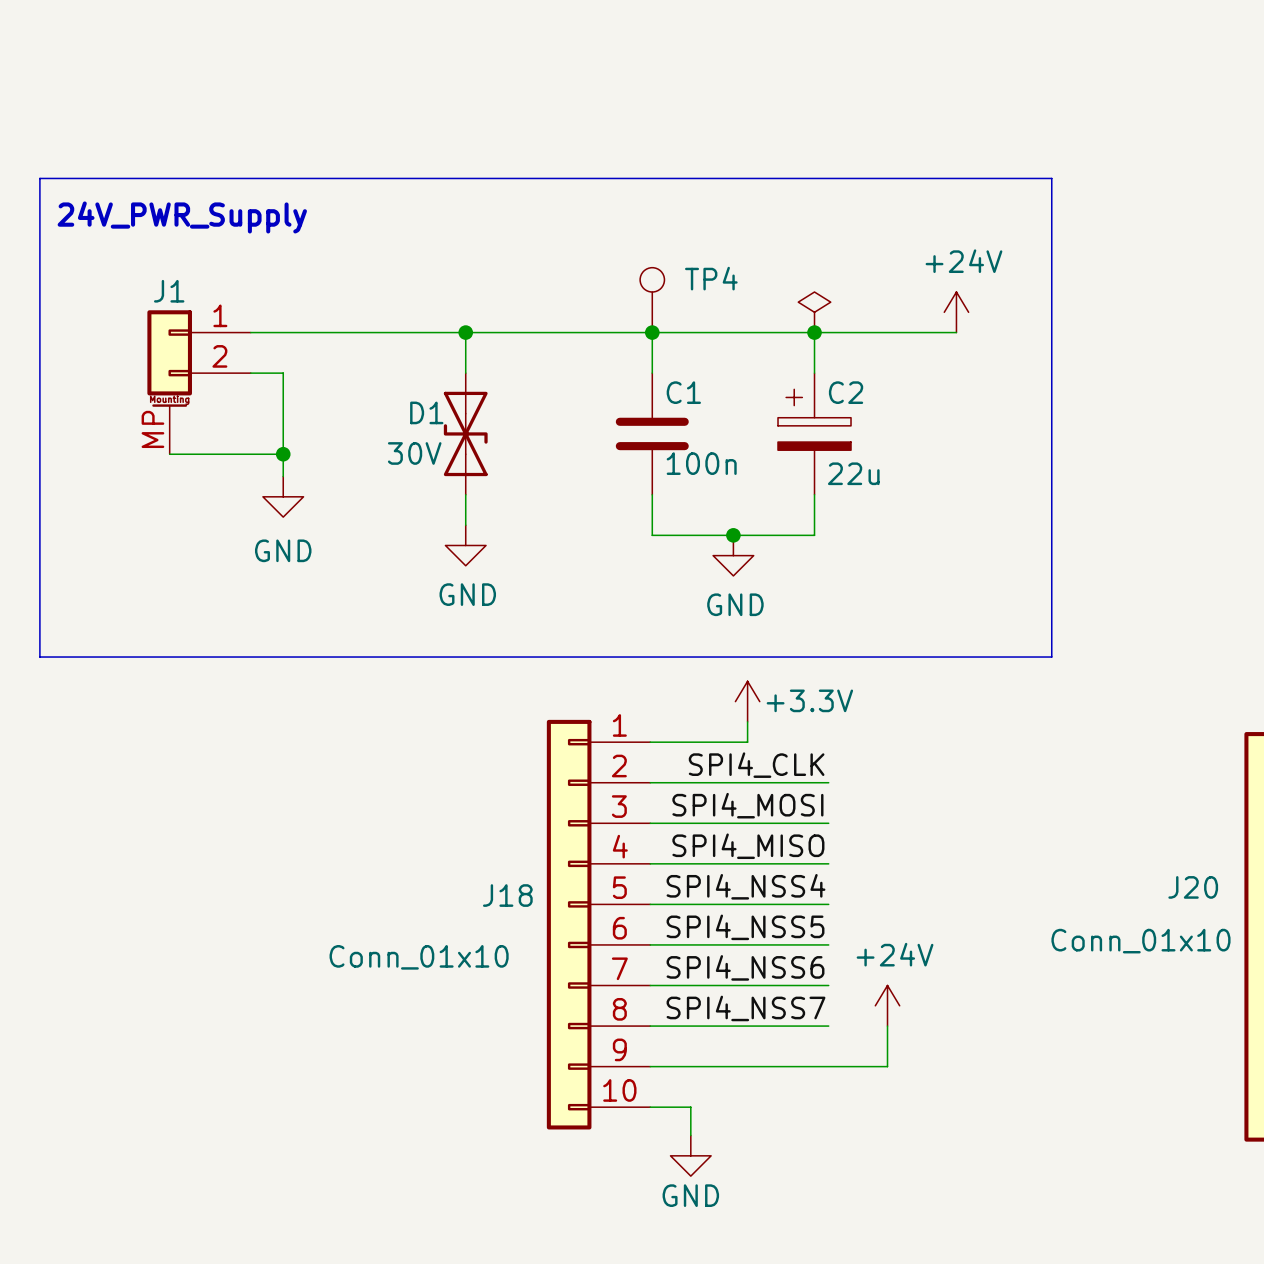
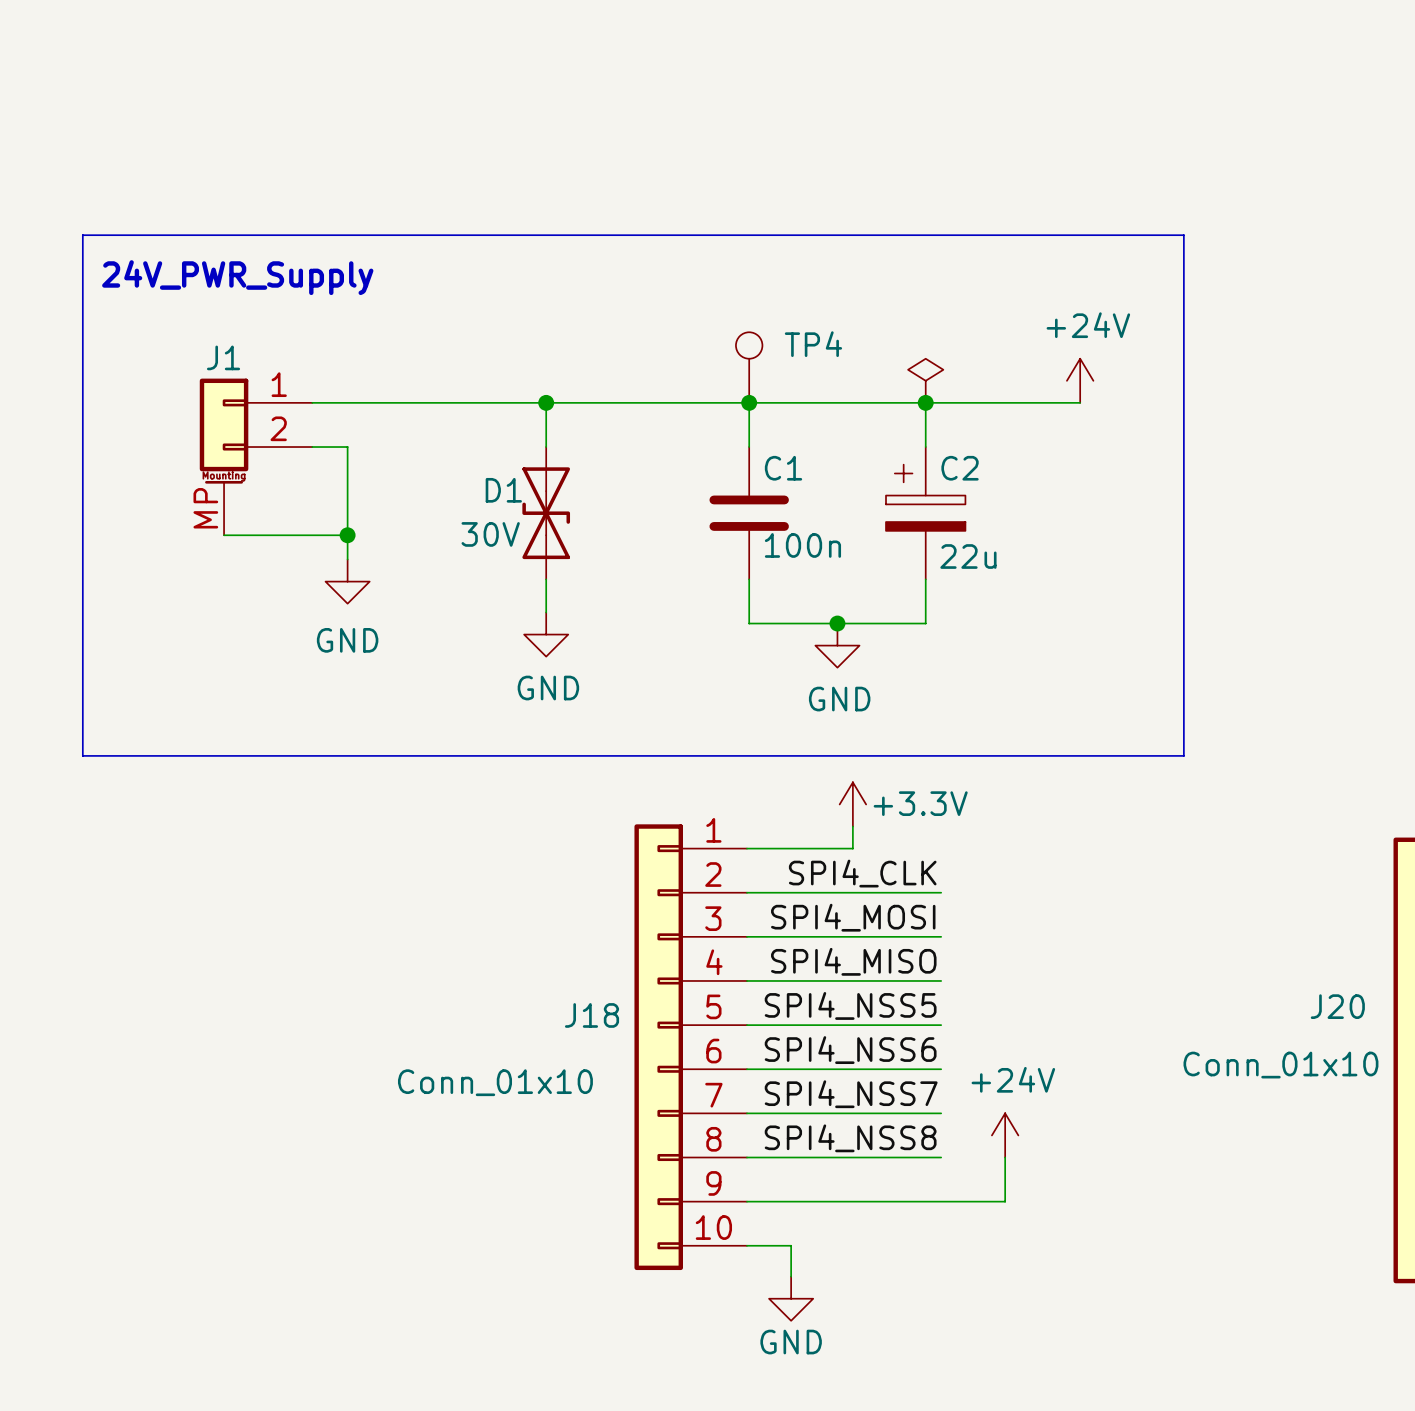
label: SPI4_NSS4 (745, 886) -> SPI4_NSS5 (850, 1005)
label: SPI4_NSS5 (745, 927) -> SPI4_NSS6 (850, 1050)
label: SPI4_NSS6 (745, 967) -> SPI4_NSS7 (851, 1094)
label: SPI4_NSS7 (745, 1008) -> SPI4_NSS8 (850, 1138)

